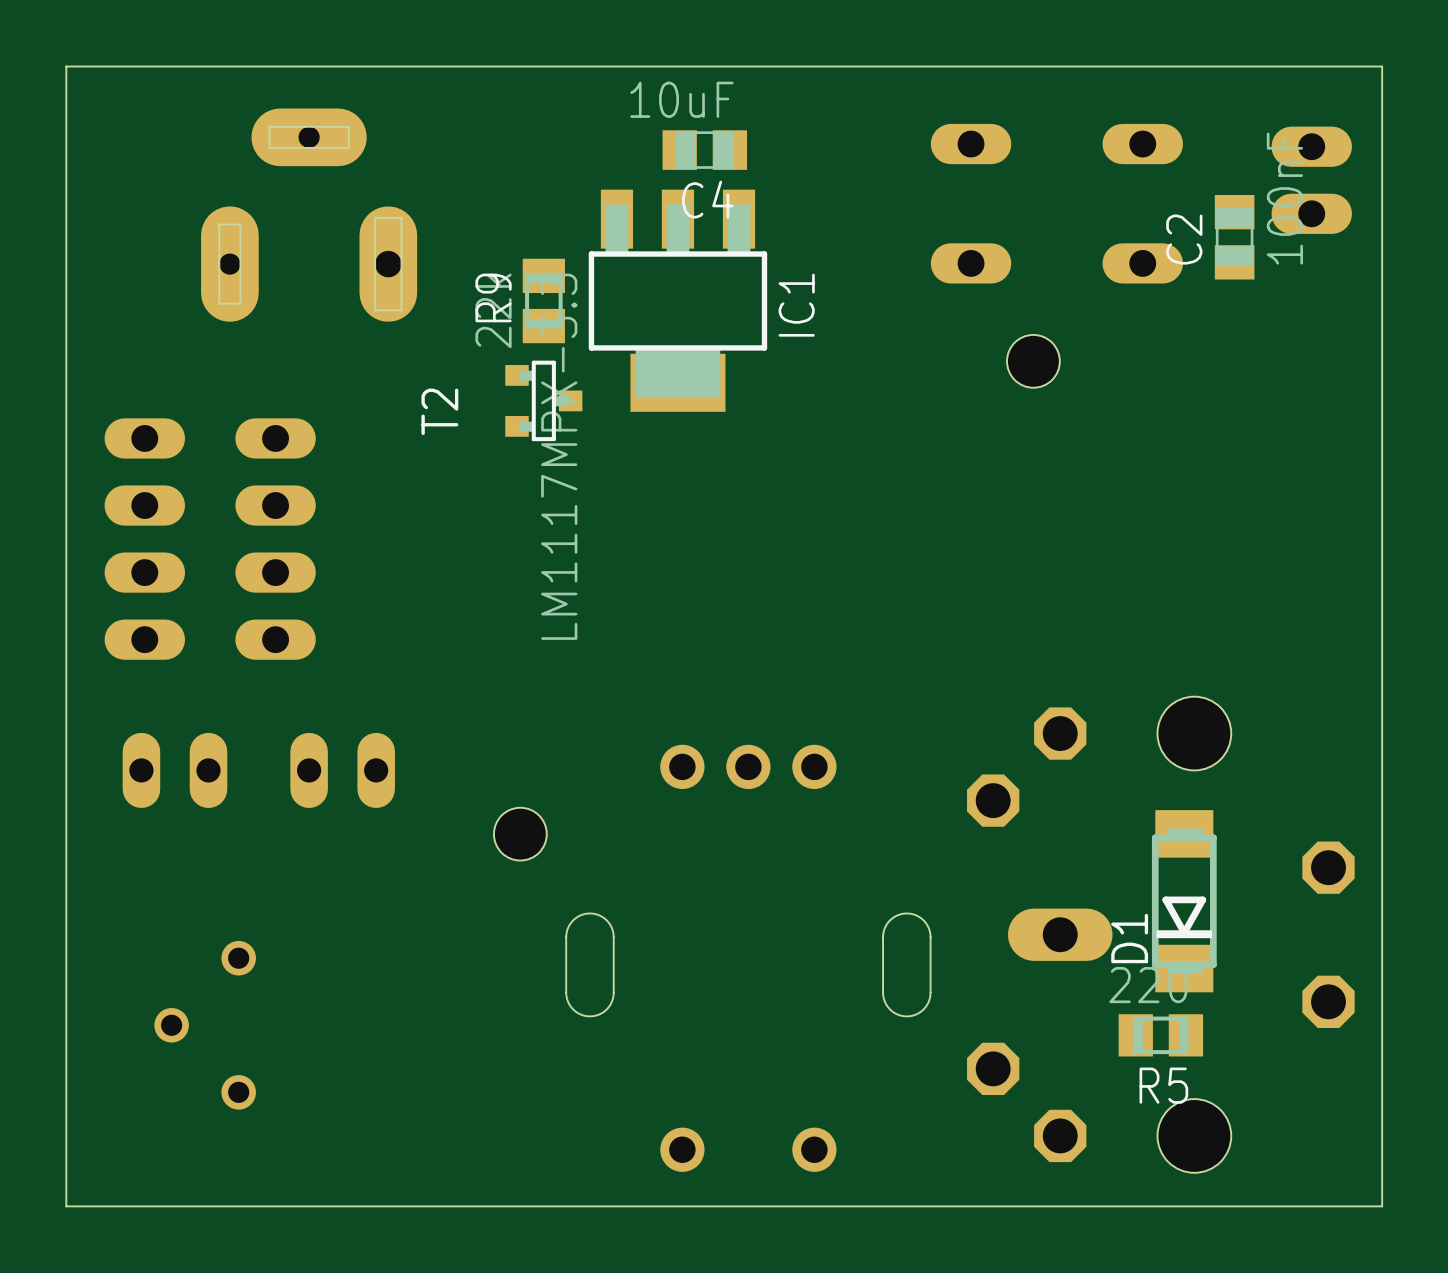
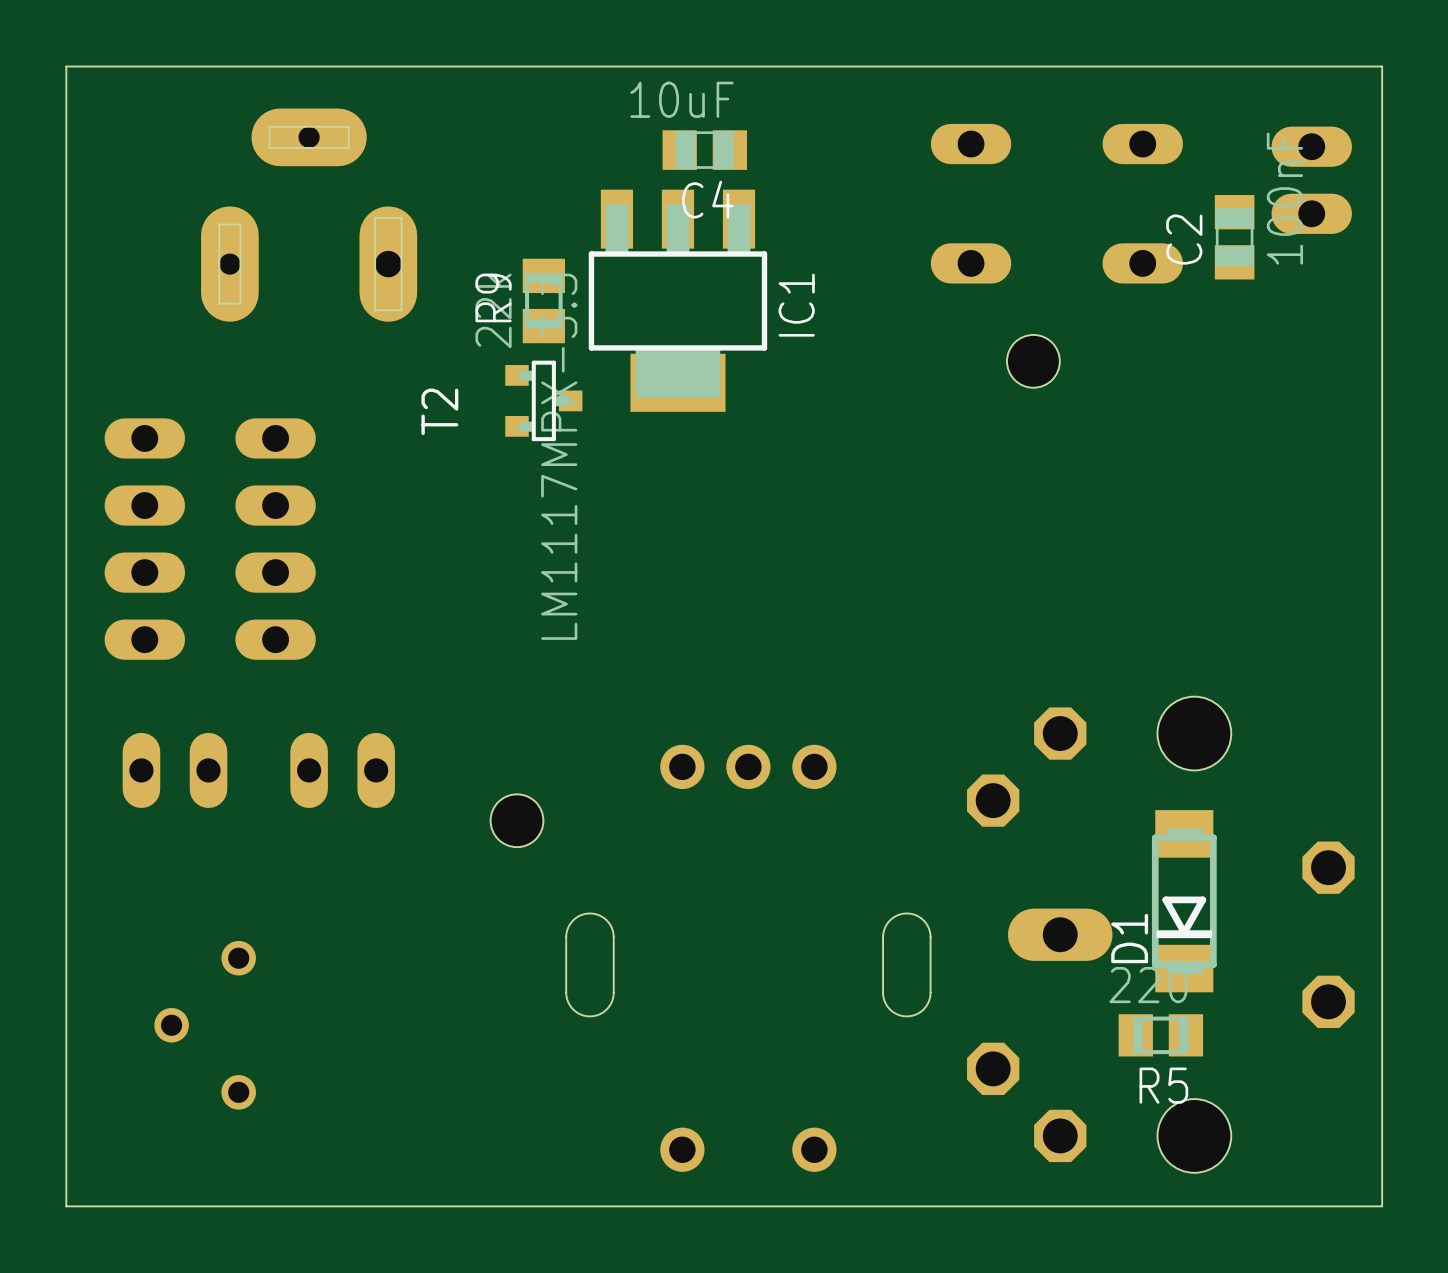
hole position: (520, 834) -> (517, 820)

